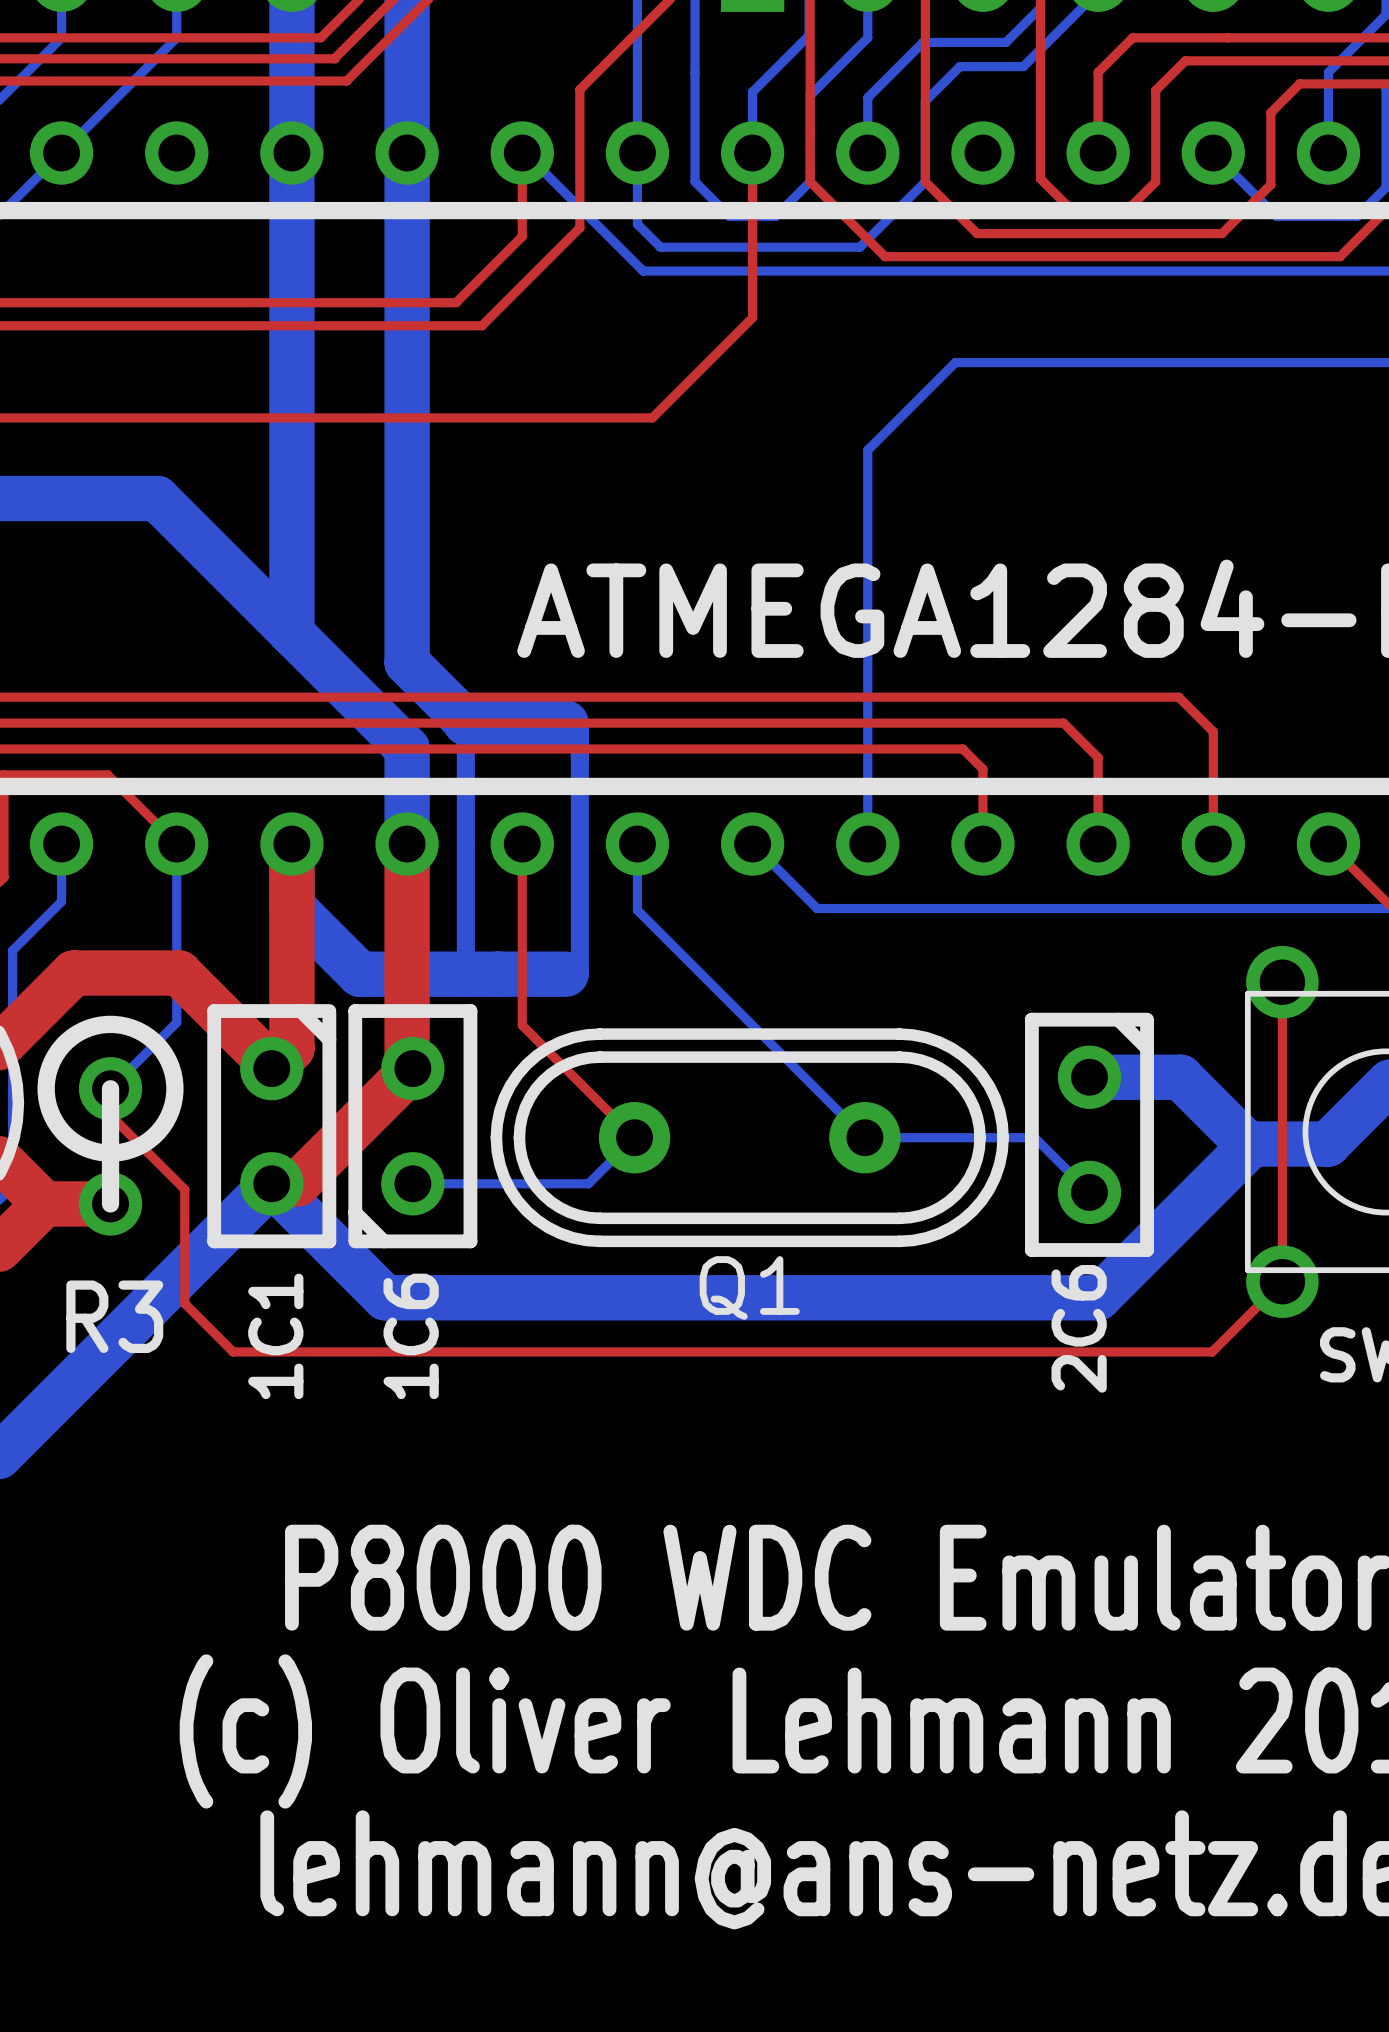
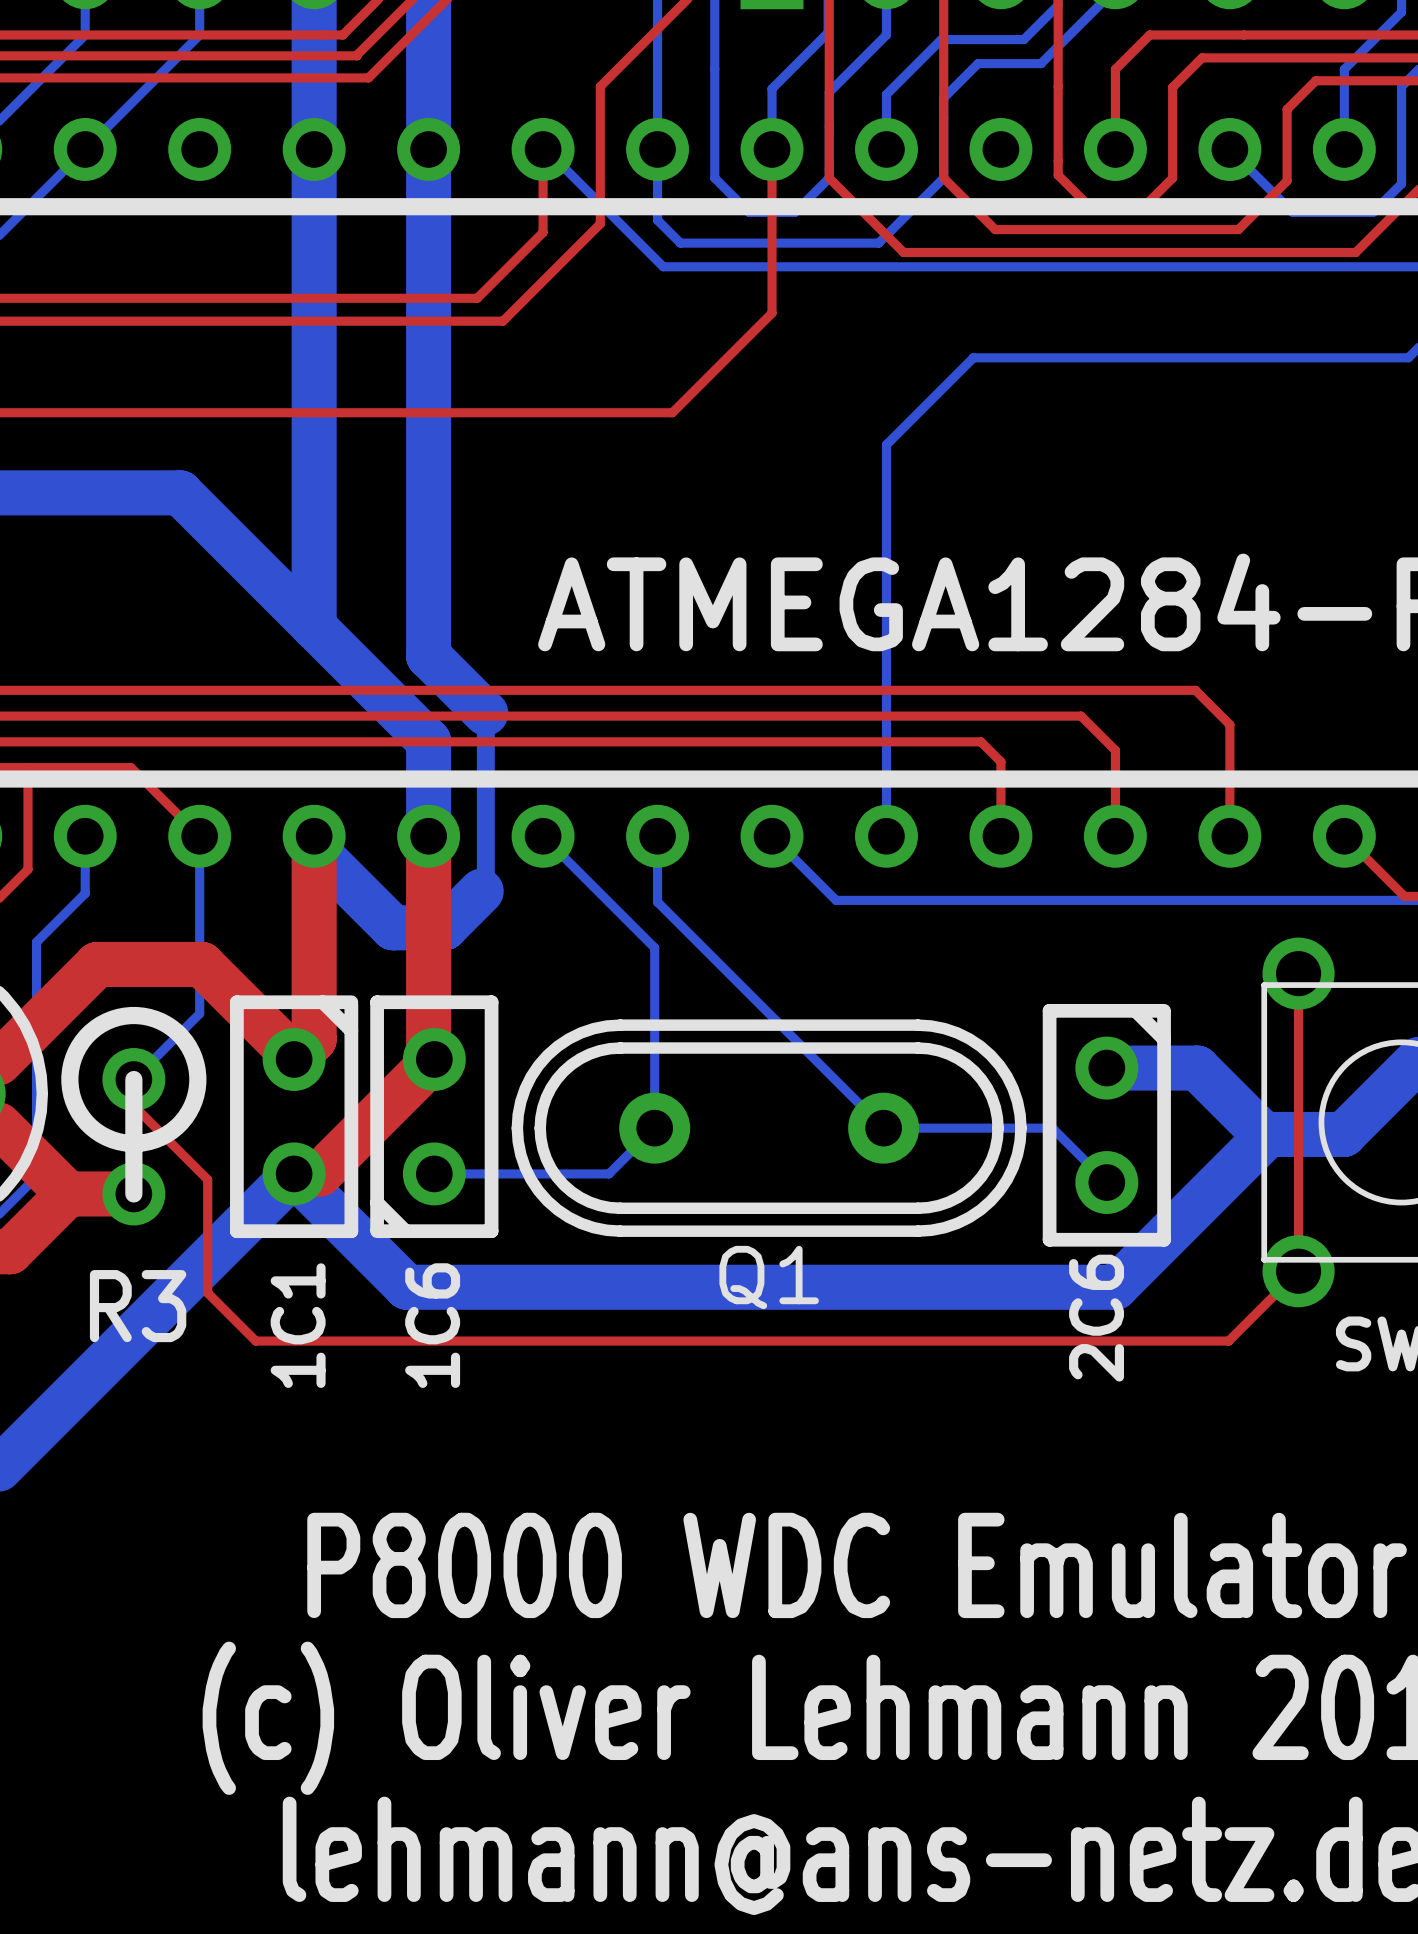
bottom track: (464, 720) (465, 974) -> (485, 713) (485, 886) (444, 927) (393, 927) (314, 848)
bottom track: (465, 723) (566, 723) -> none
bottom track: (546, 723) (579, 723) (579, 975) -> none
bottom track: none -> (543, 836) (654, 947) (654, 1128)
top track: (522, 844) (522, 1025) (634, 1137) -> none
bottom track: (291, 856) (291, 906) (359, 974) (566, 974) (498, 974) -> none

